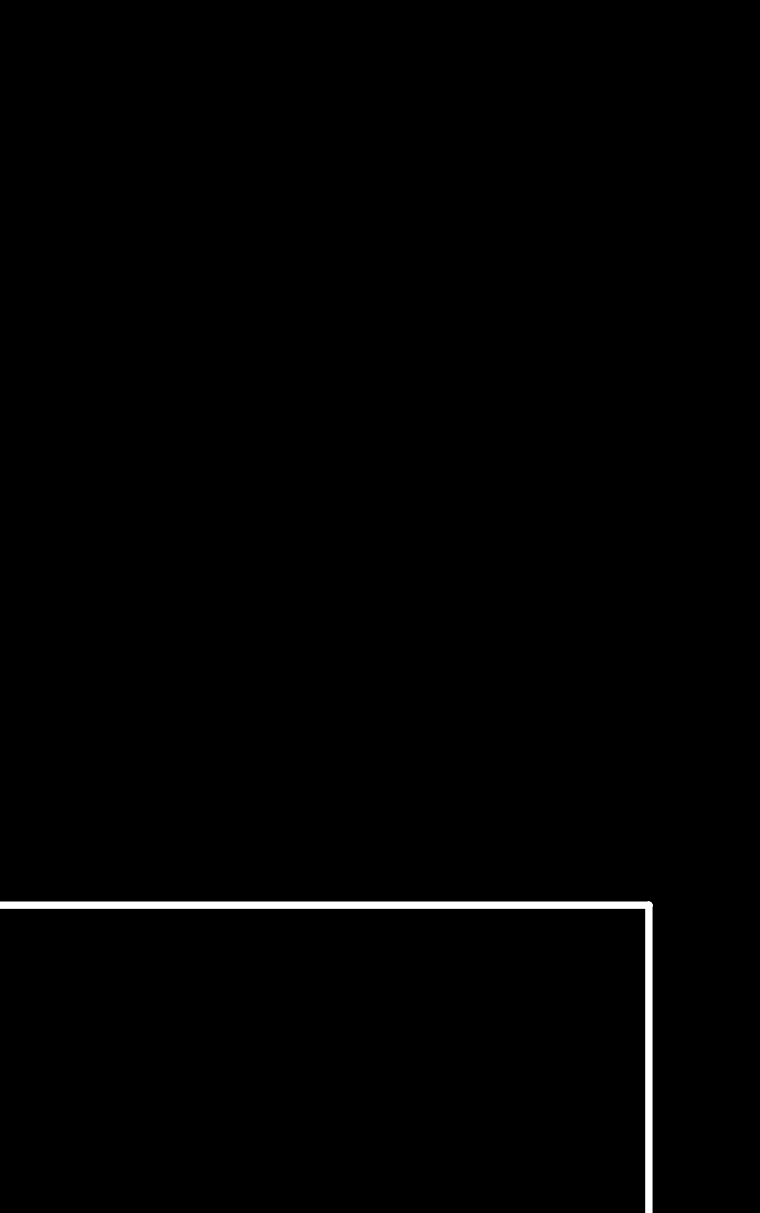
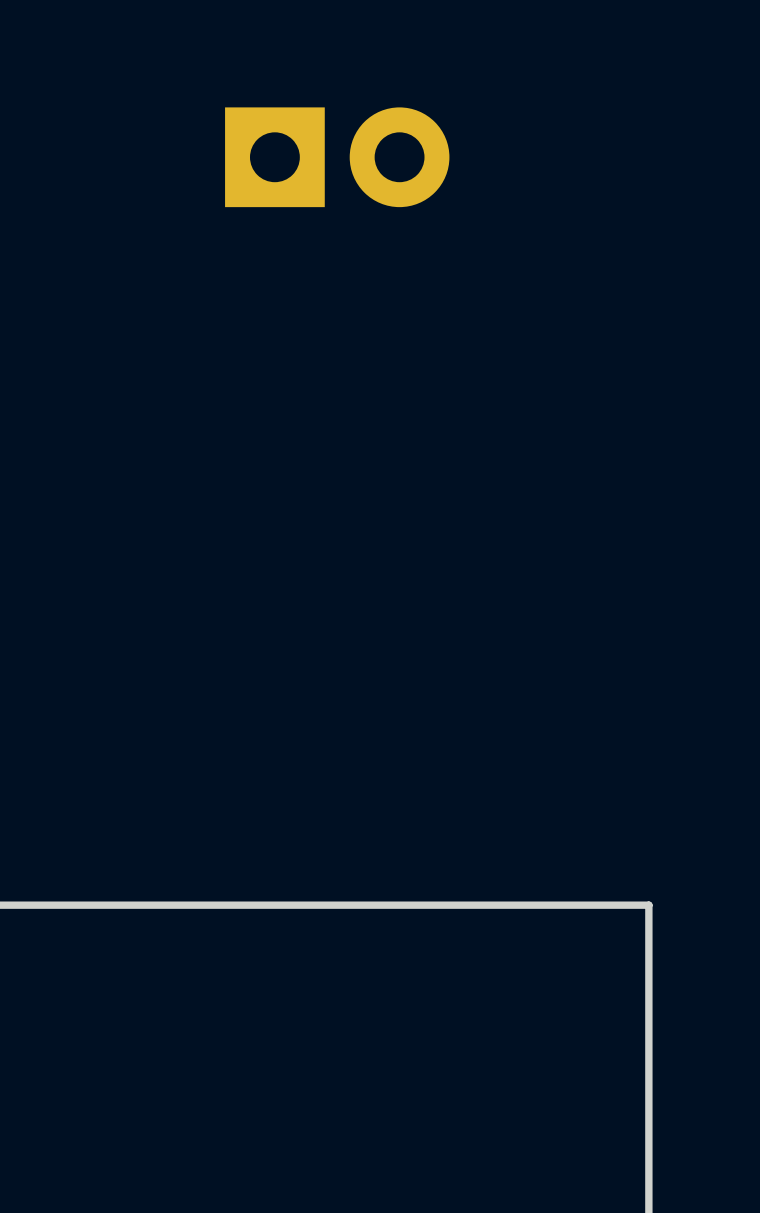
part: none -> (337, 157)

